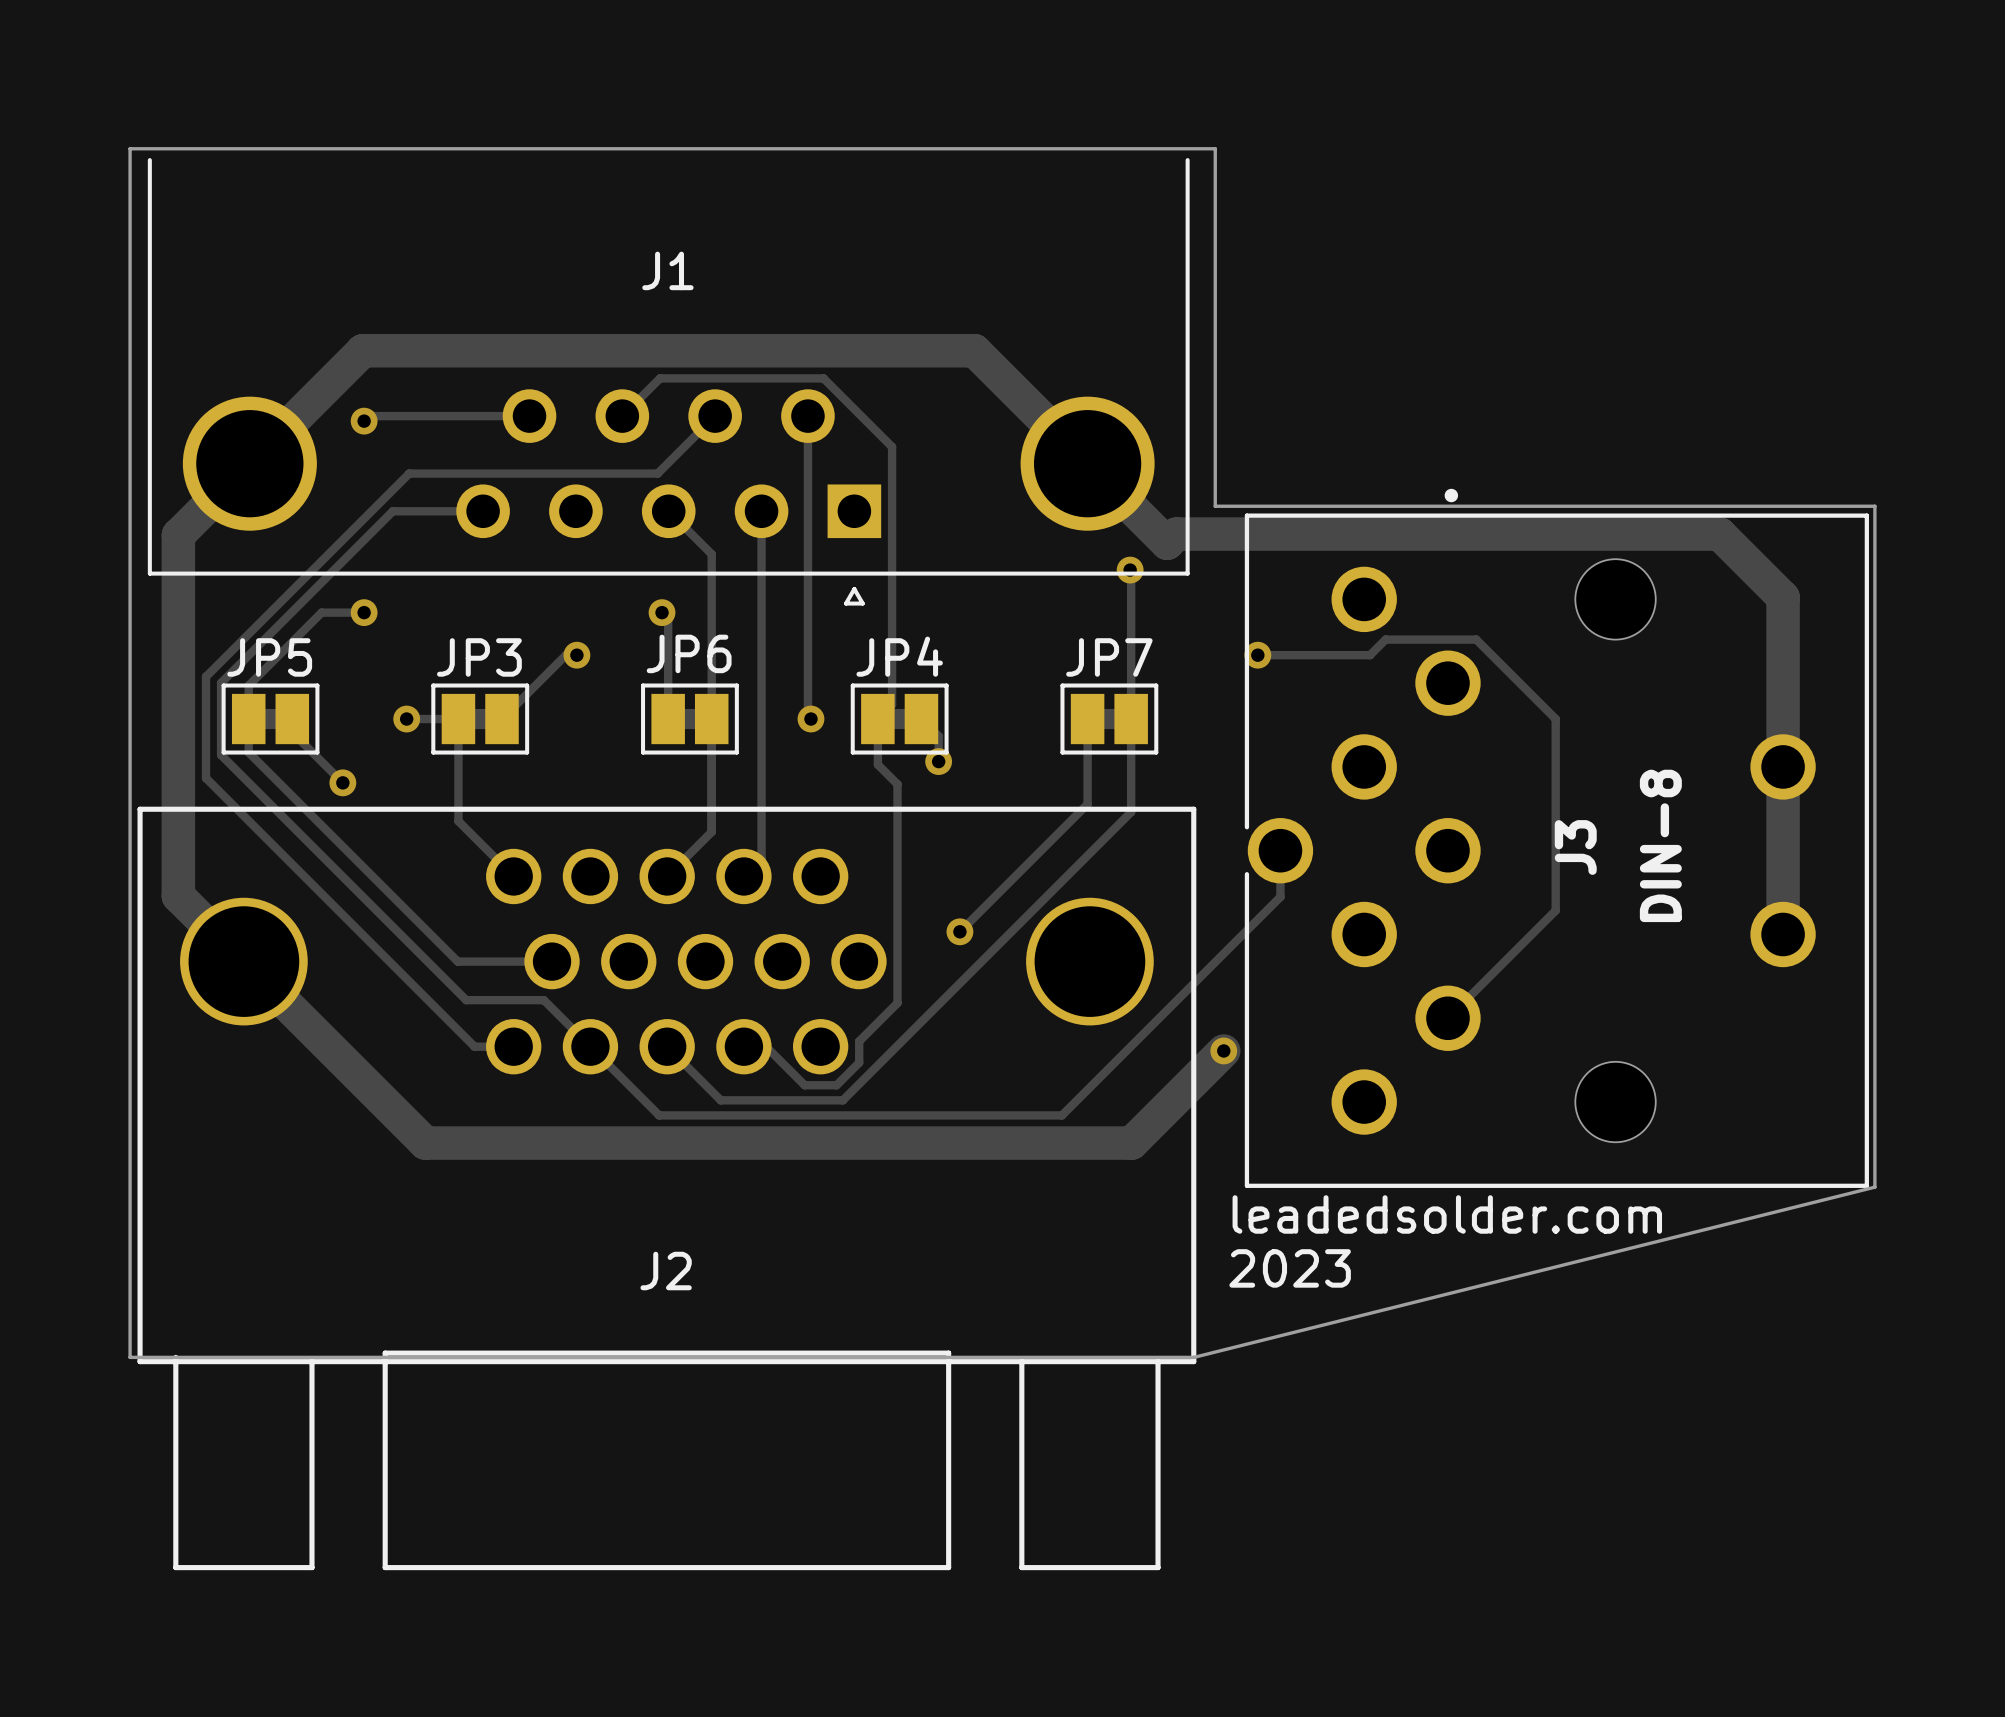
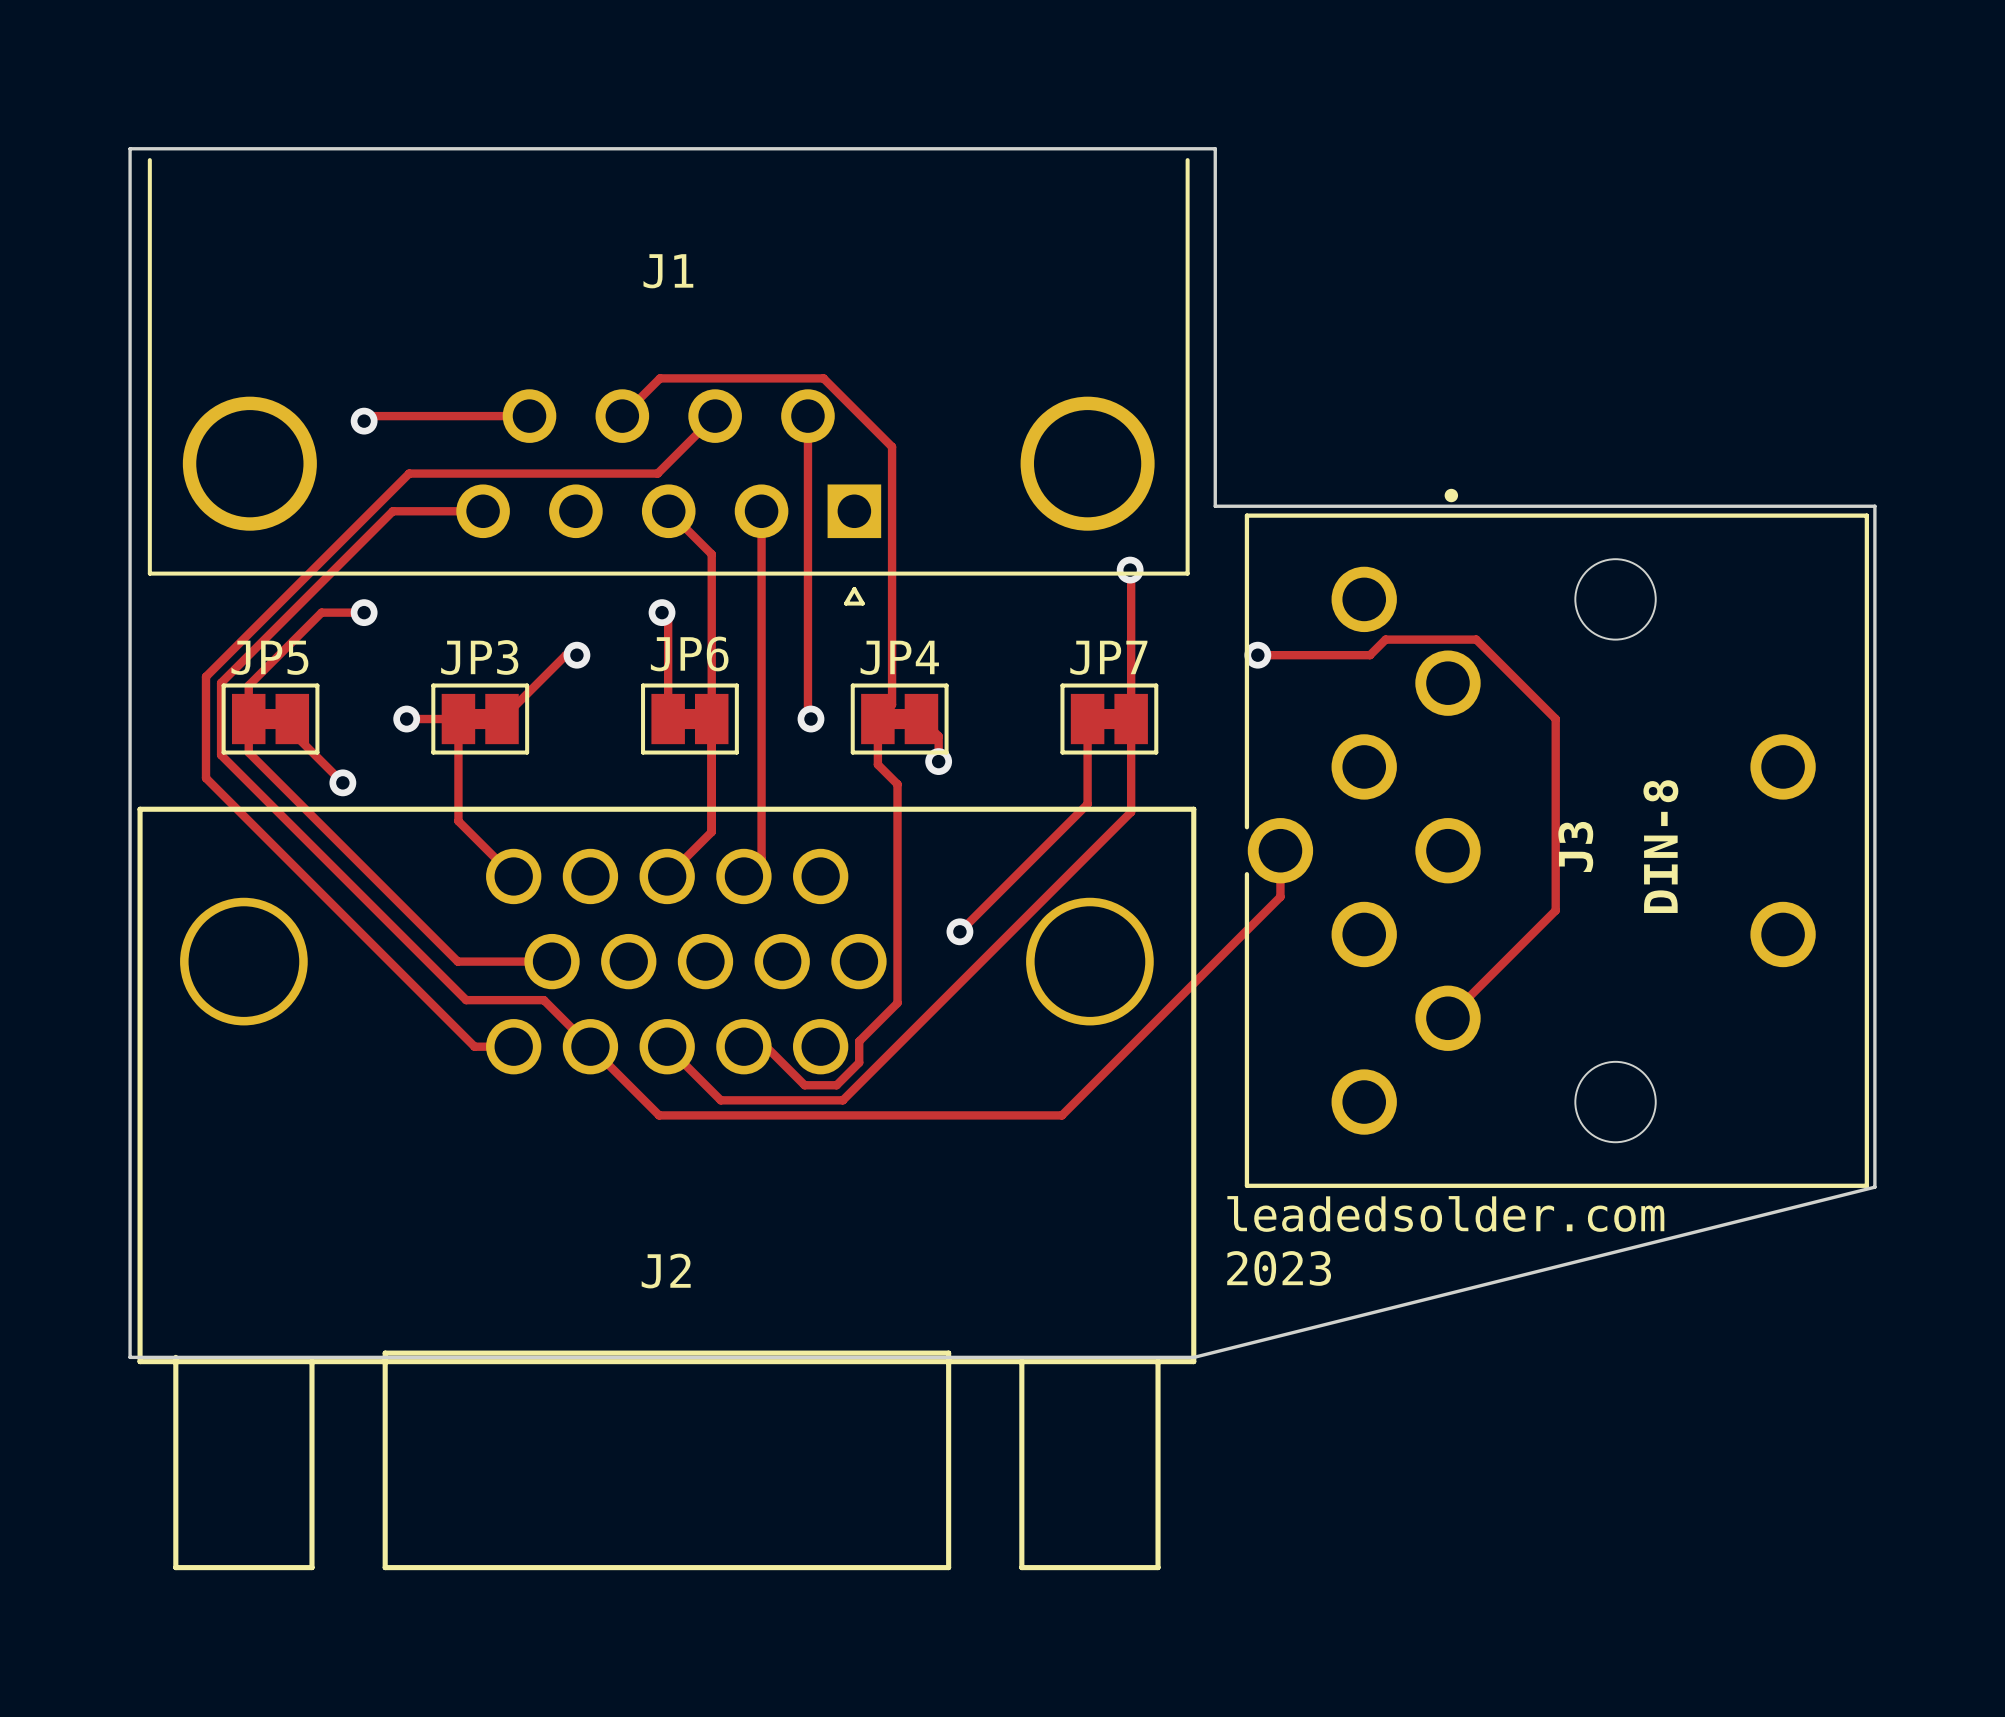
track: (1783, 934) (1783, 597) (1719, 534) (1176, 534) (1167, 543) (974, 350) (362, 350) (178, 535) (178, 896) (425, 1143) (1131, 1143) (1223, 1050) -> none
via: (1223, 1050) -> none

